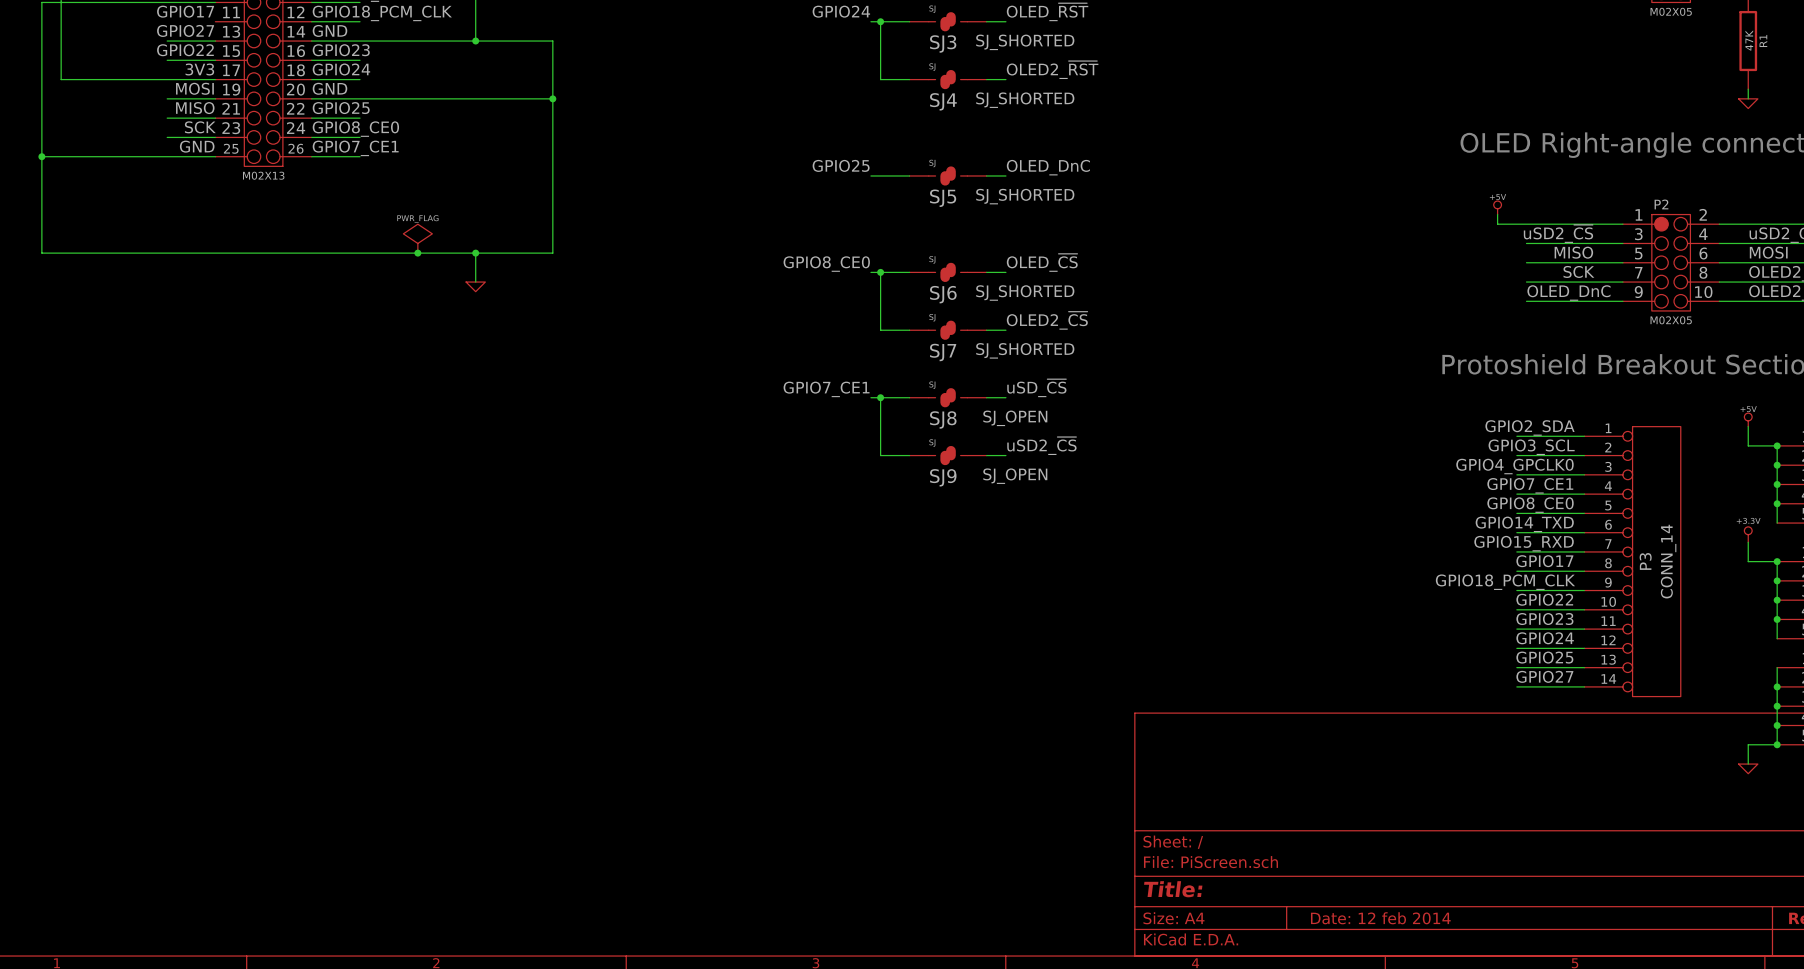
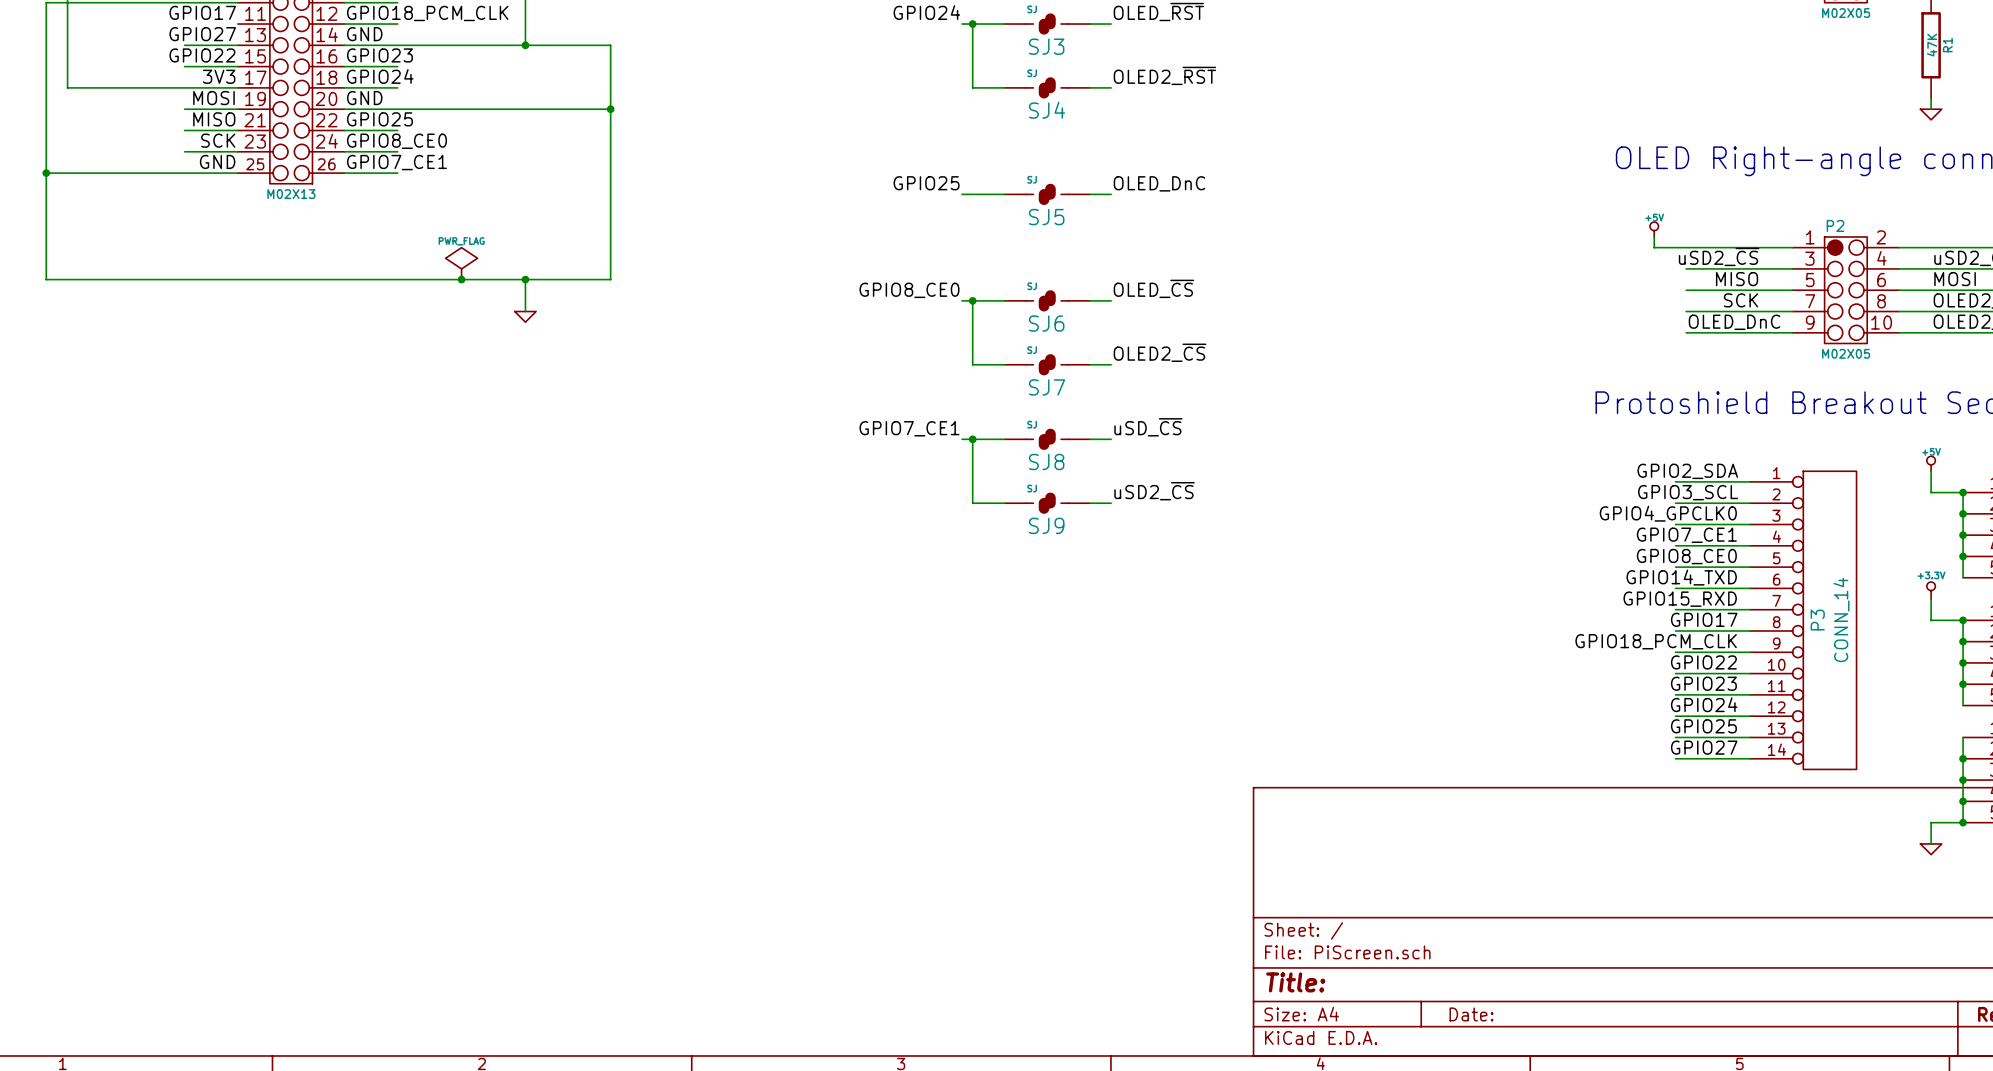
SJ3 text: SJ_SHORTED (1025, 42) -> none
SJ4 text: SJ_SHORTED (1025, 100) -> none
SJ5 text: SJ_SHORTED (1025, 196) -> none
SJ6 text: SJ_SHORTED (1025, 293) -> none
SJ7 text: SJ_SHORTED (1025, 350) -> none
SJ8 text: SJ_OPEN (1015, 418) -> none
SJ9 text: SJ_OPEN (1015, 476) -> none
title block: Date: 12 feb 2014 (1380, 918) -> Date: (1471, 1014)

